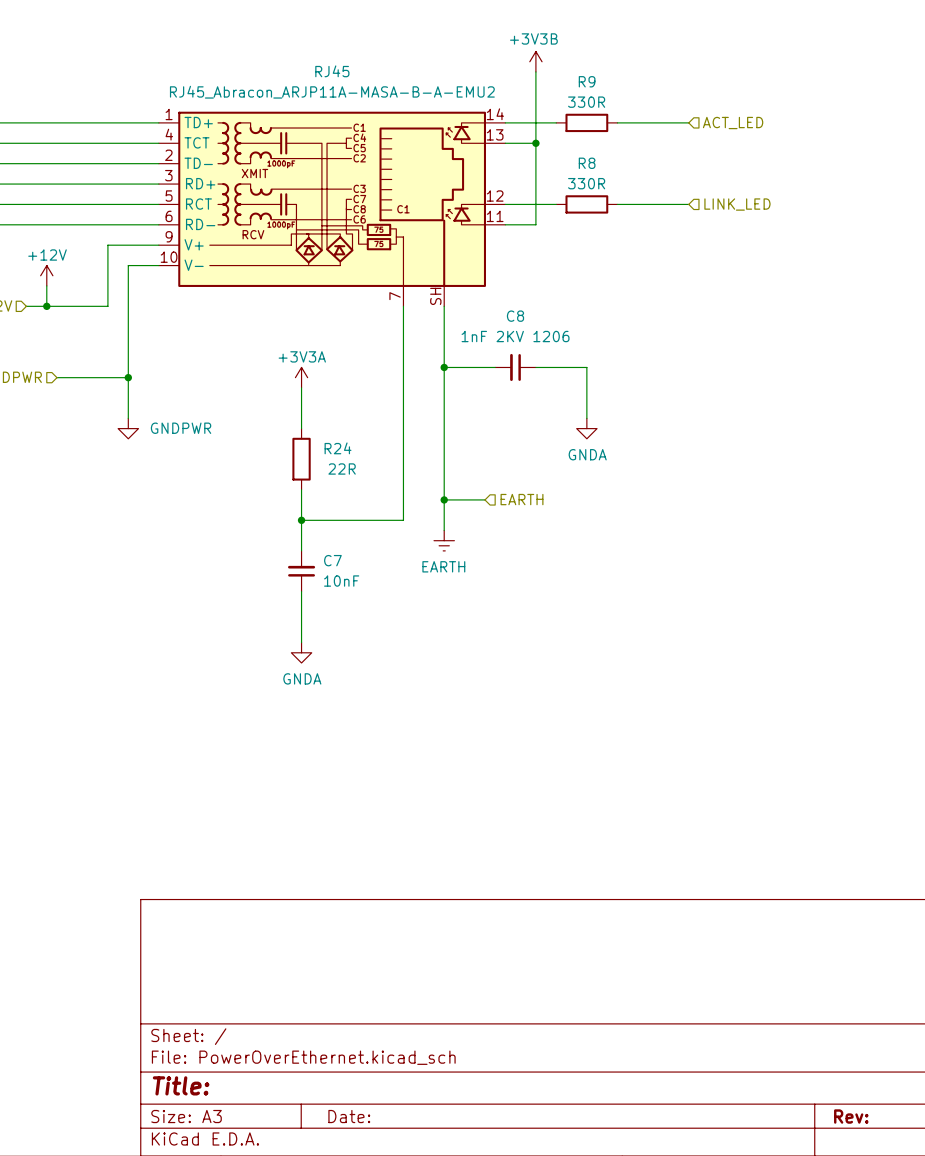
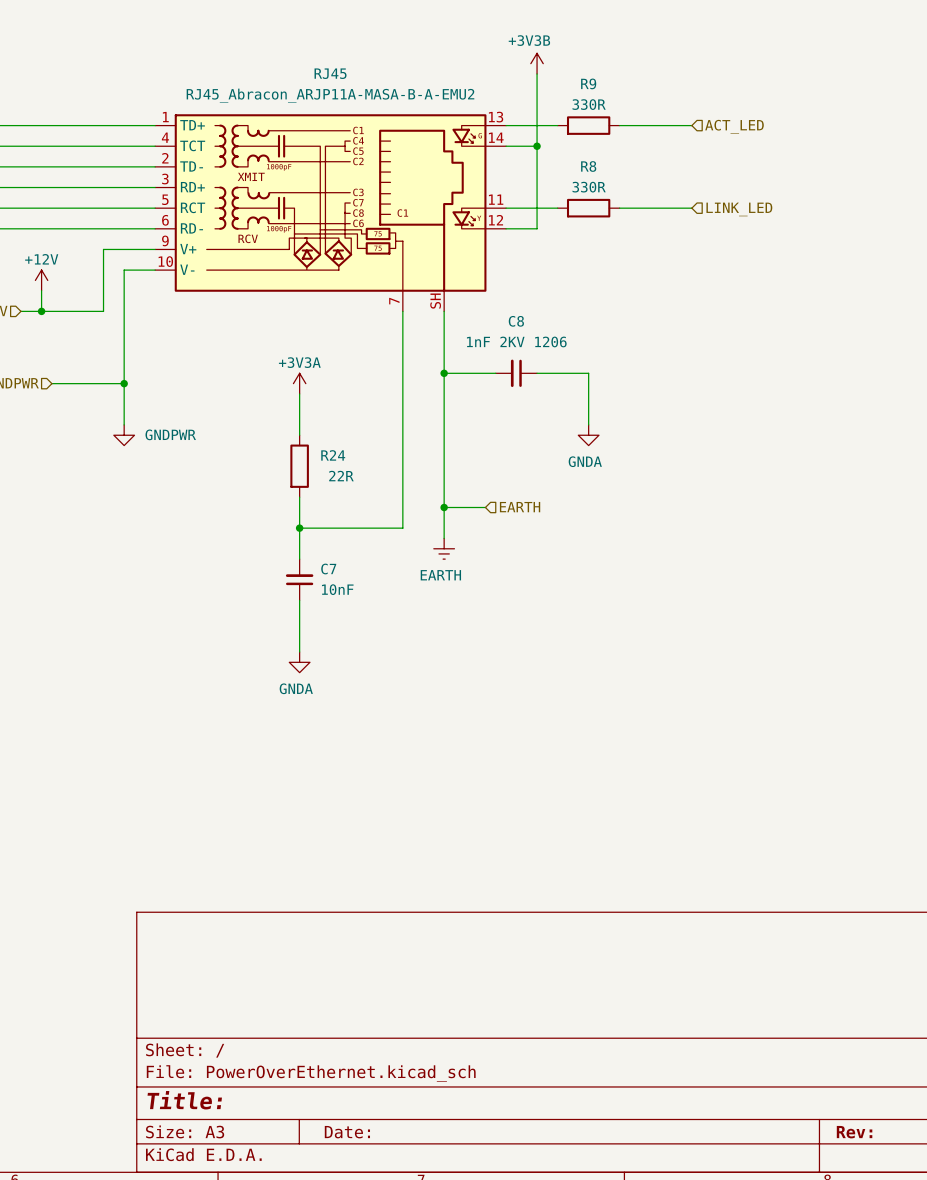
RJ45 symbol: [158, 111, 506, 307] -> [155, 114, 507, 312]

